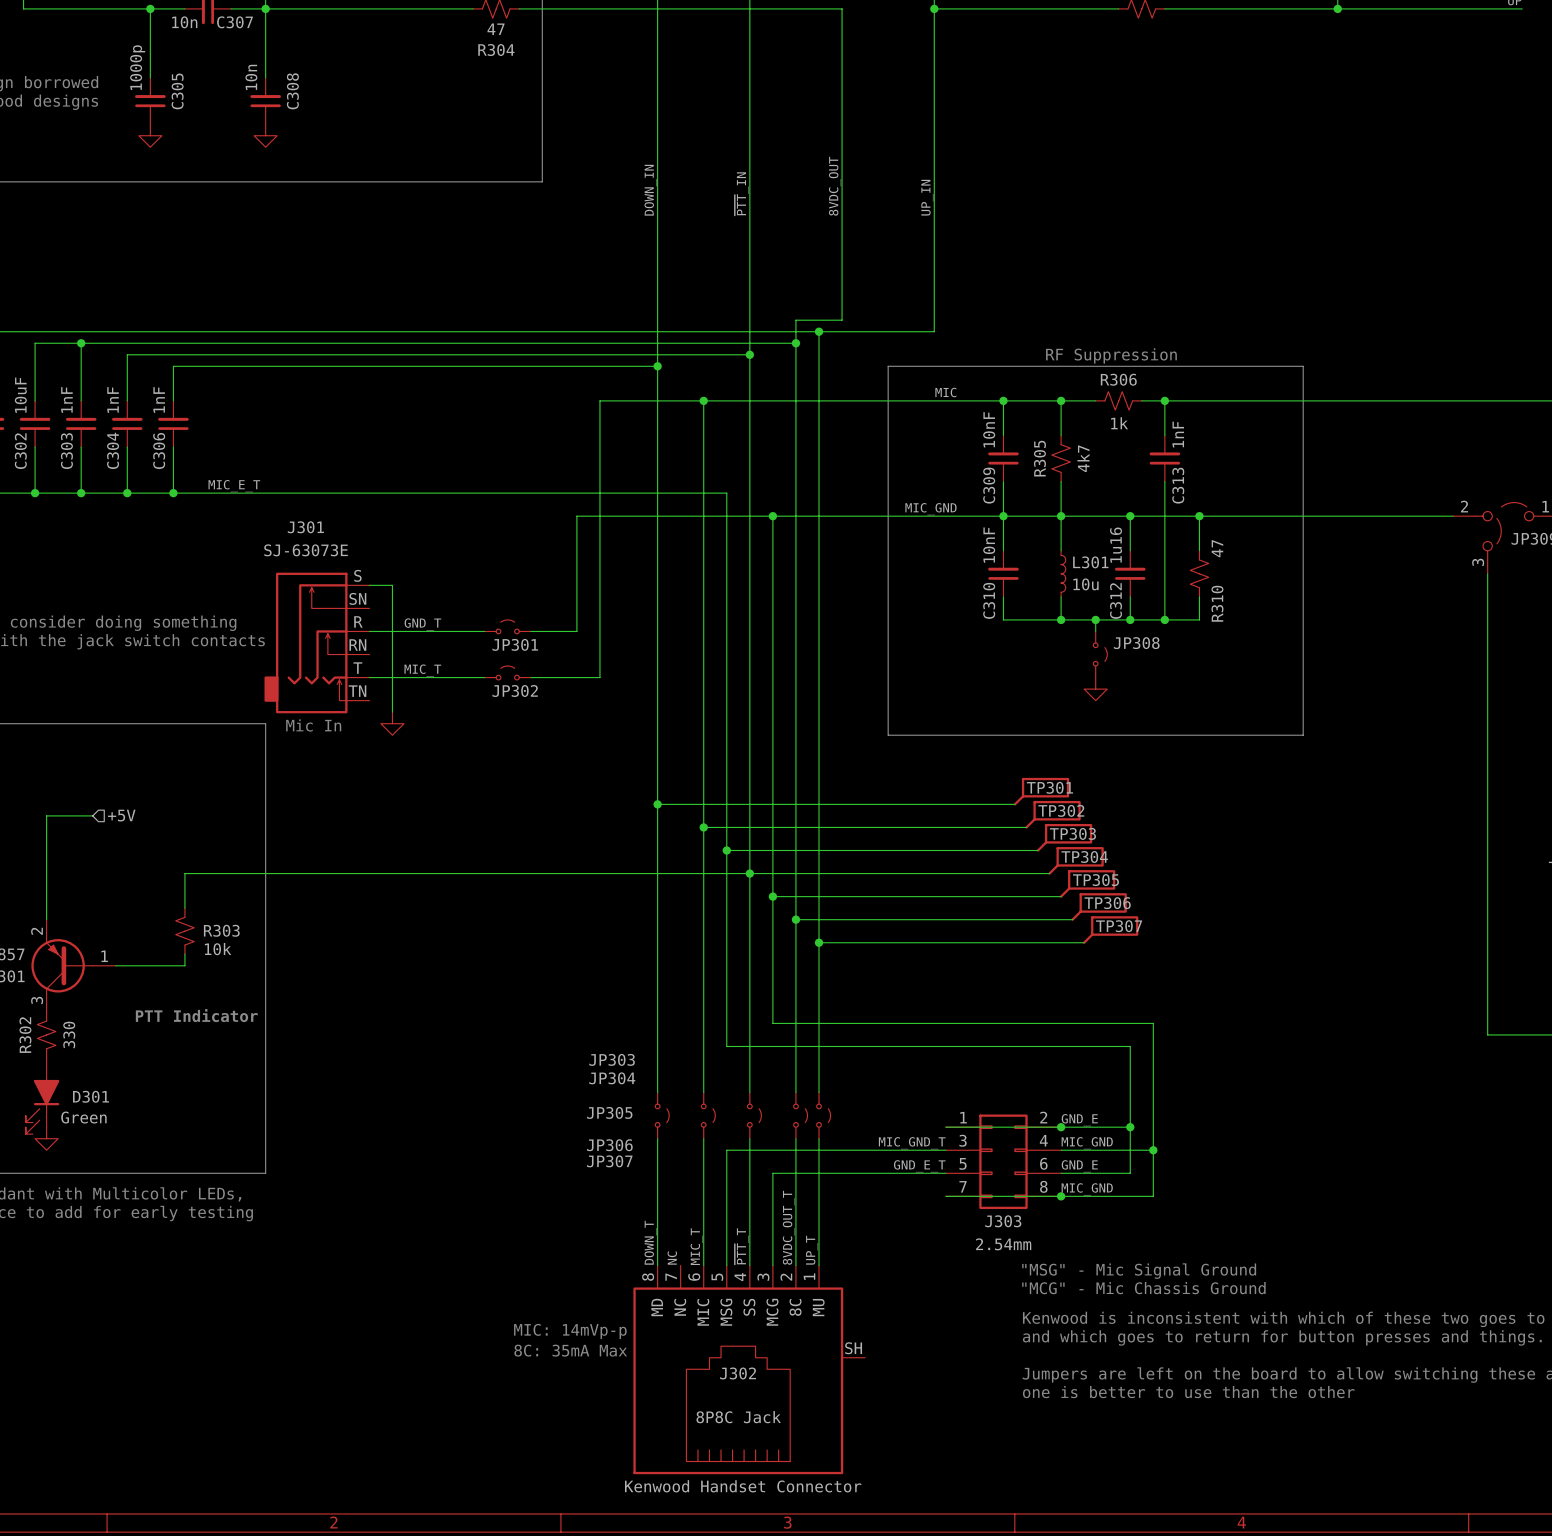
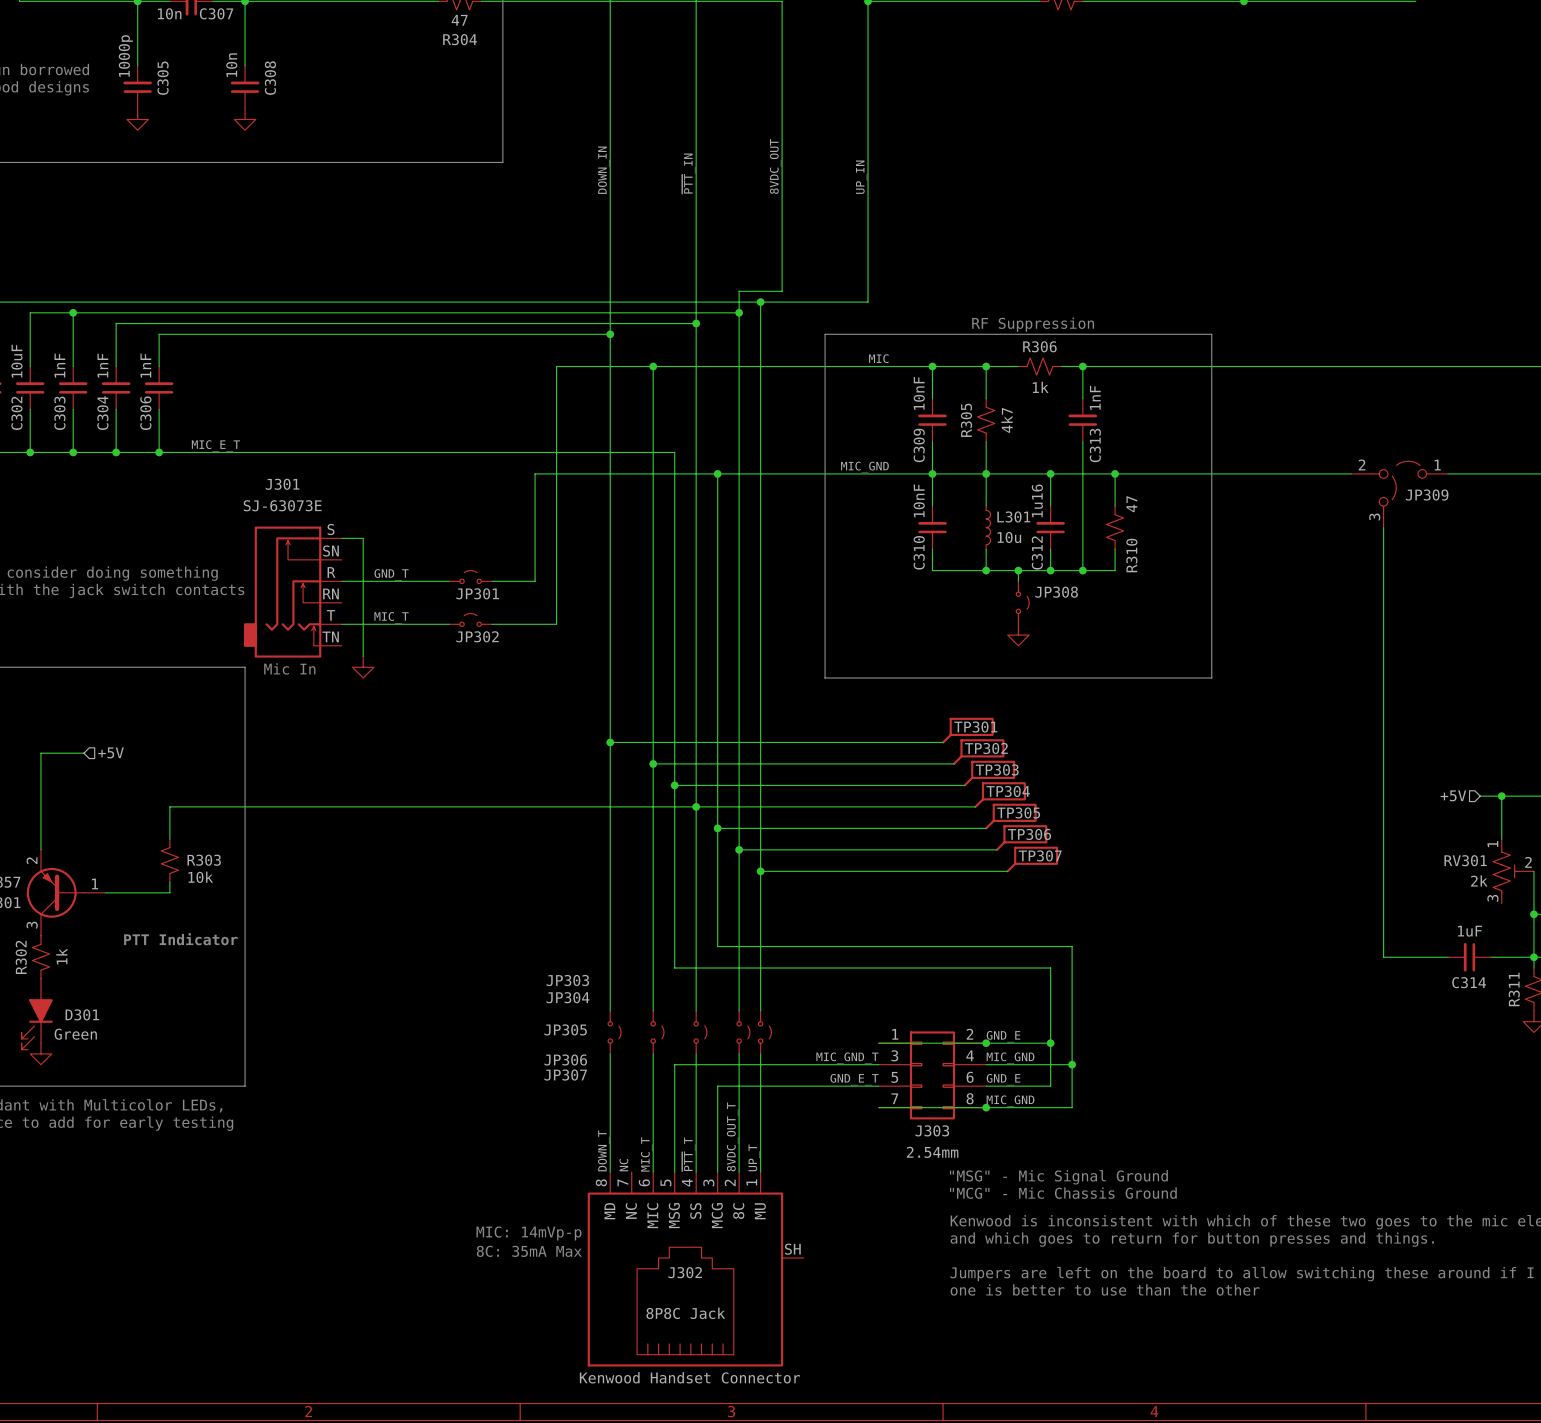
R302 value: 330 (69, 1034) -> 1k (61, 956)

